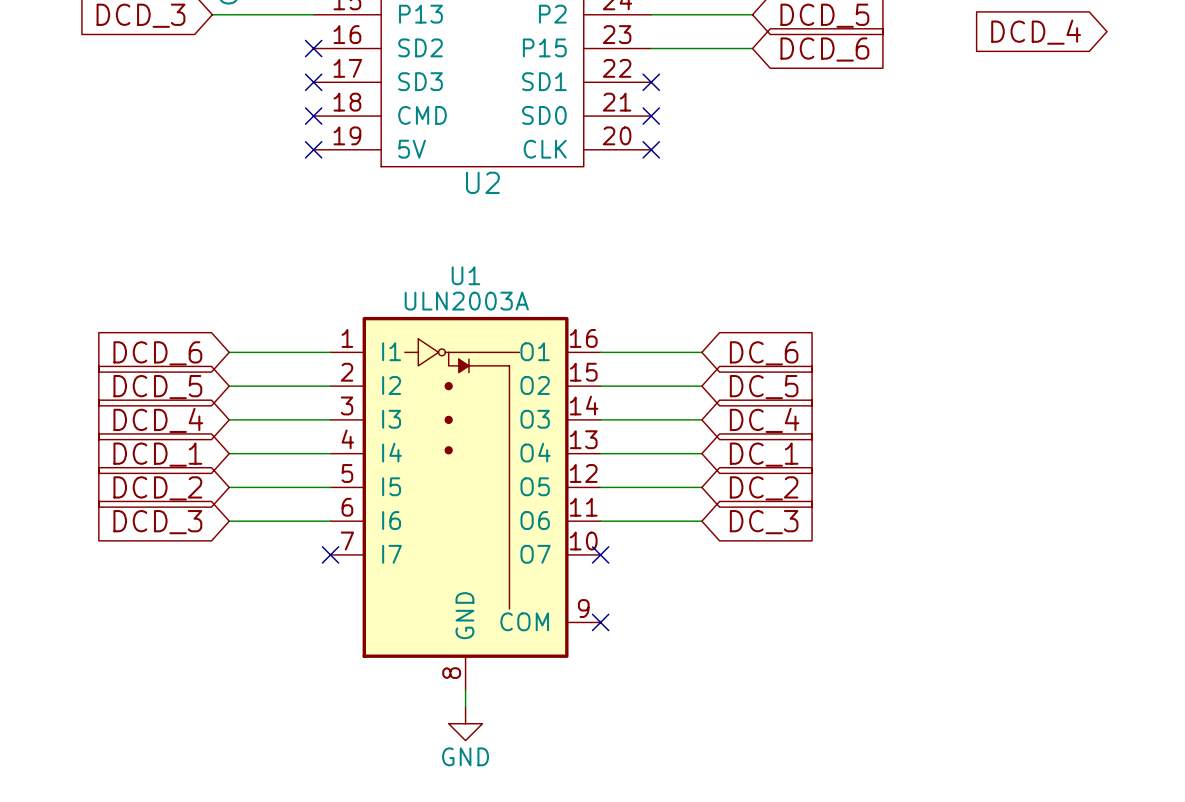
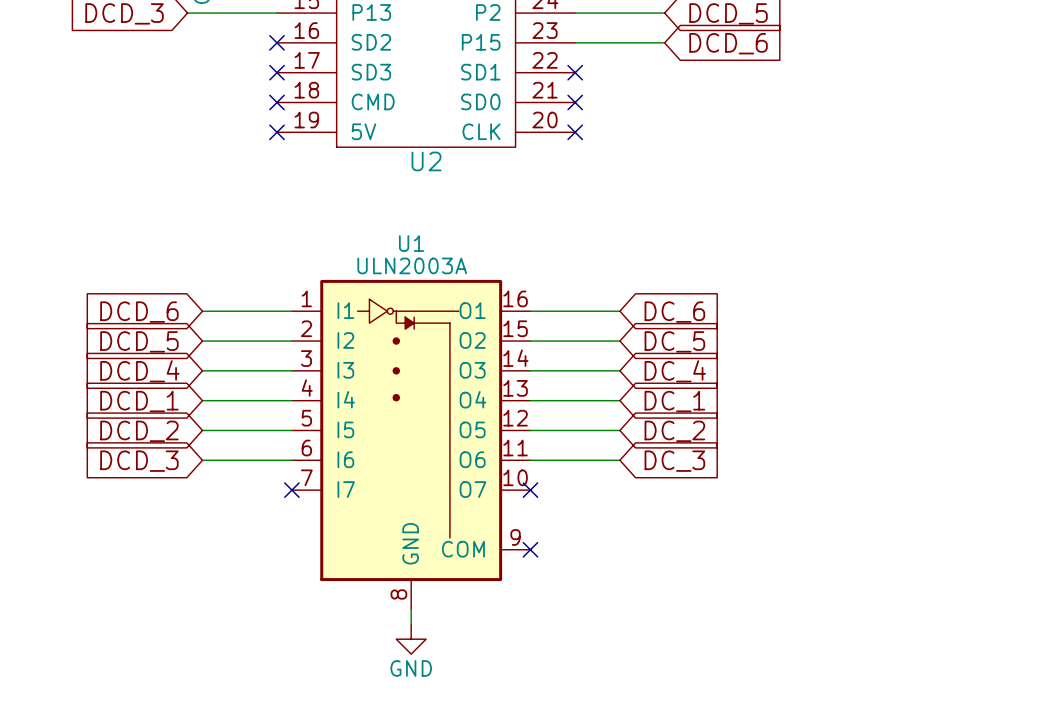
global label: DCD_4 (1036, 32) -> none

